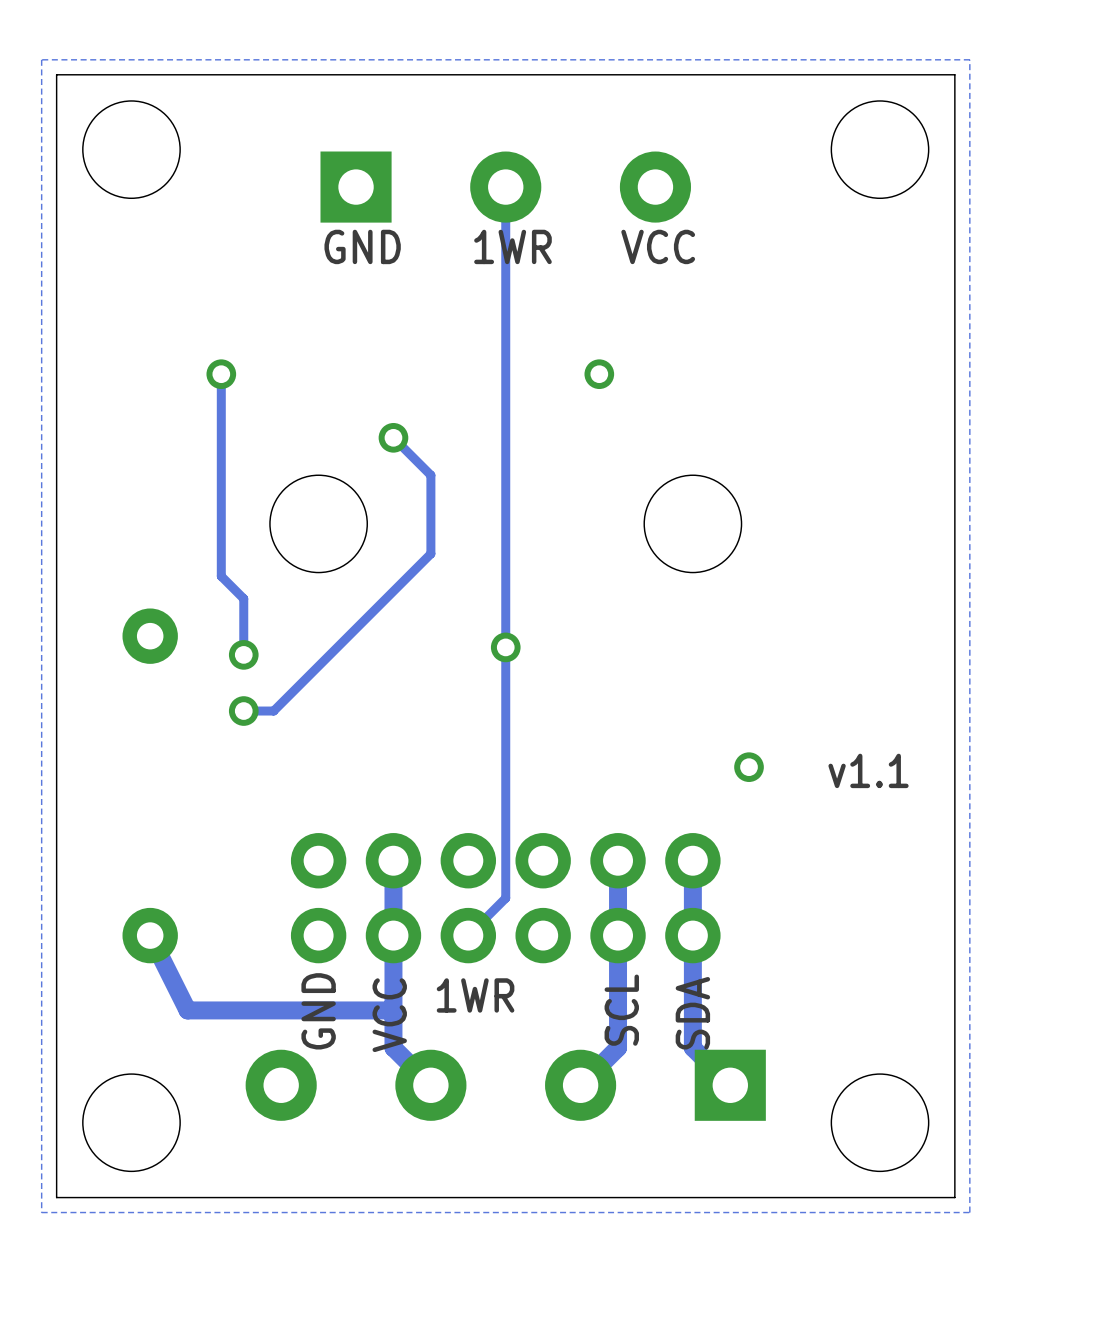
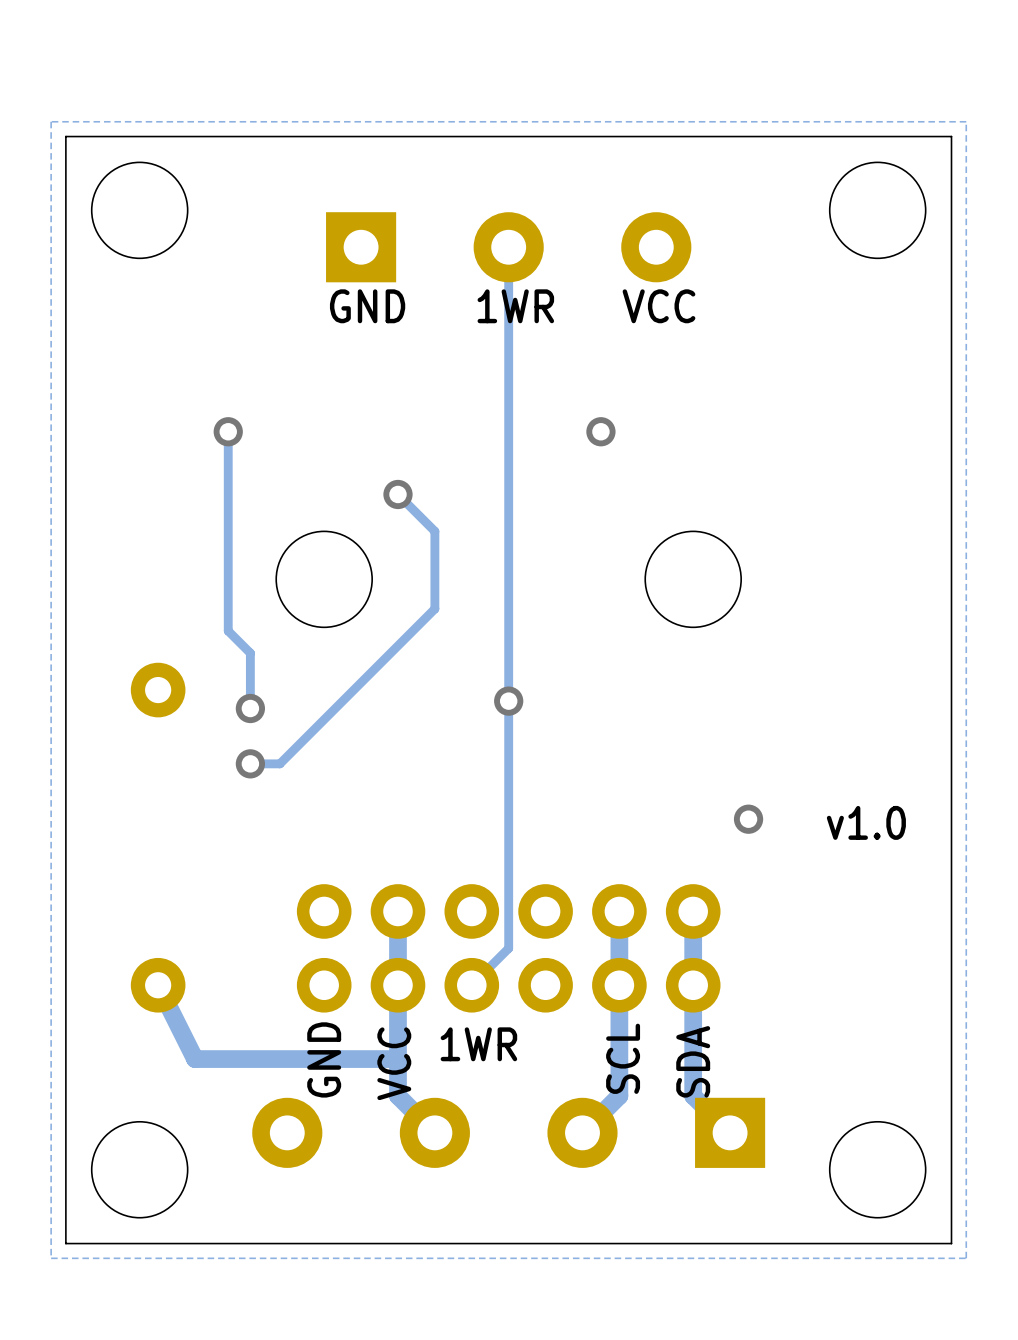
text: v1.1 (868, 770) -> v1.0 (866, 822)

